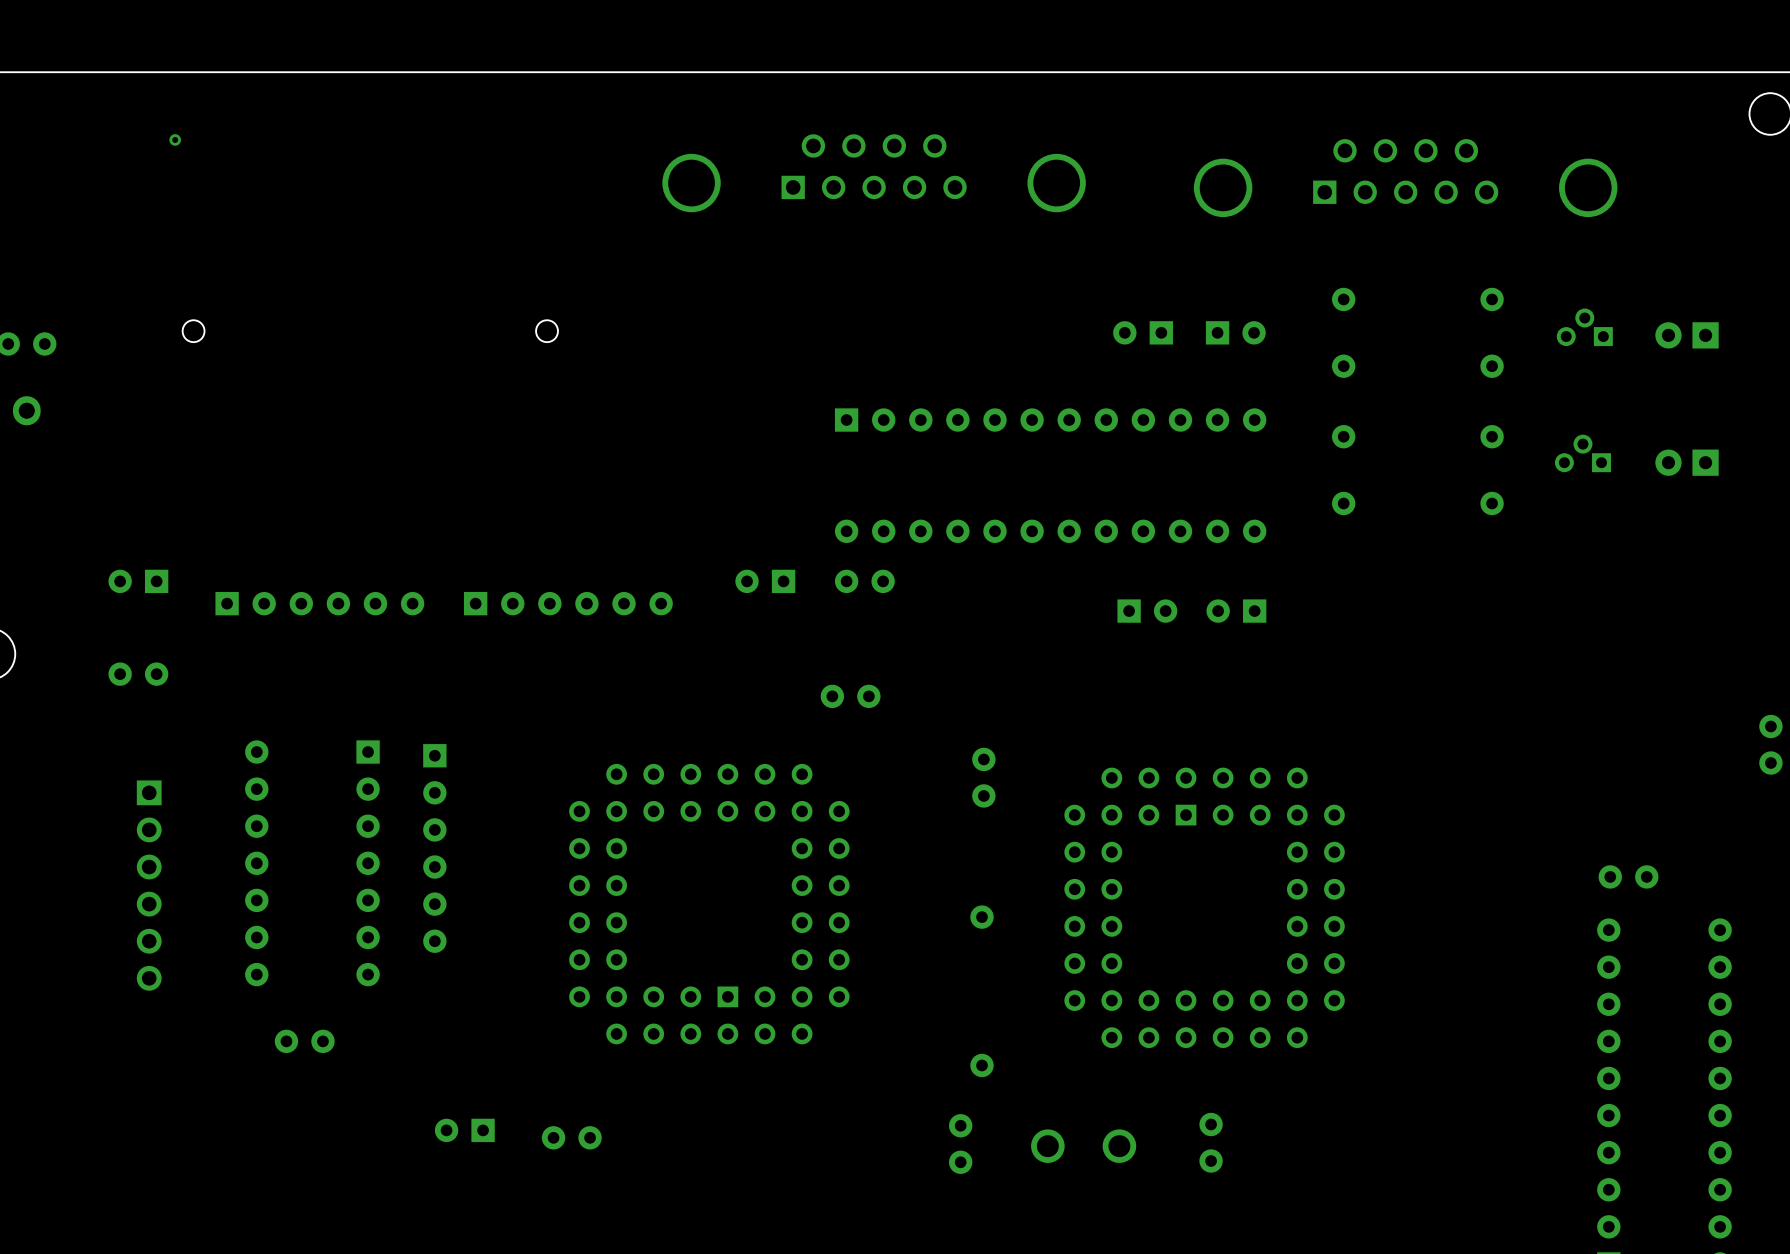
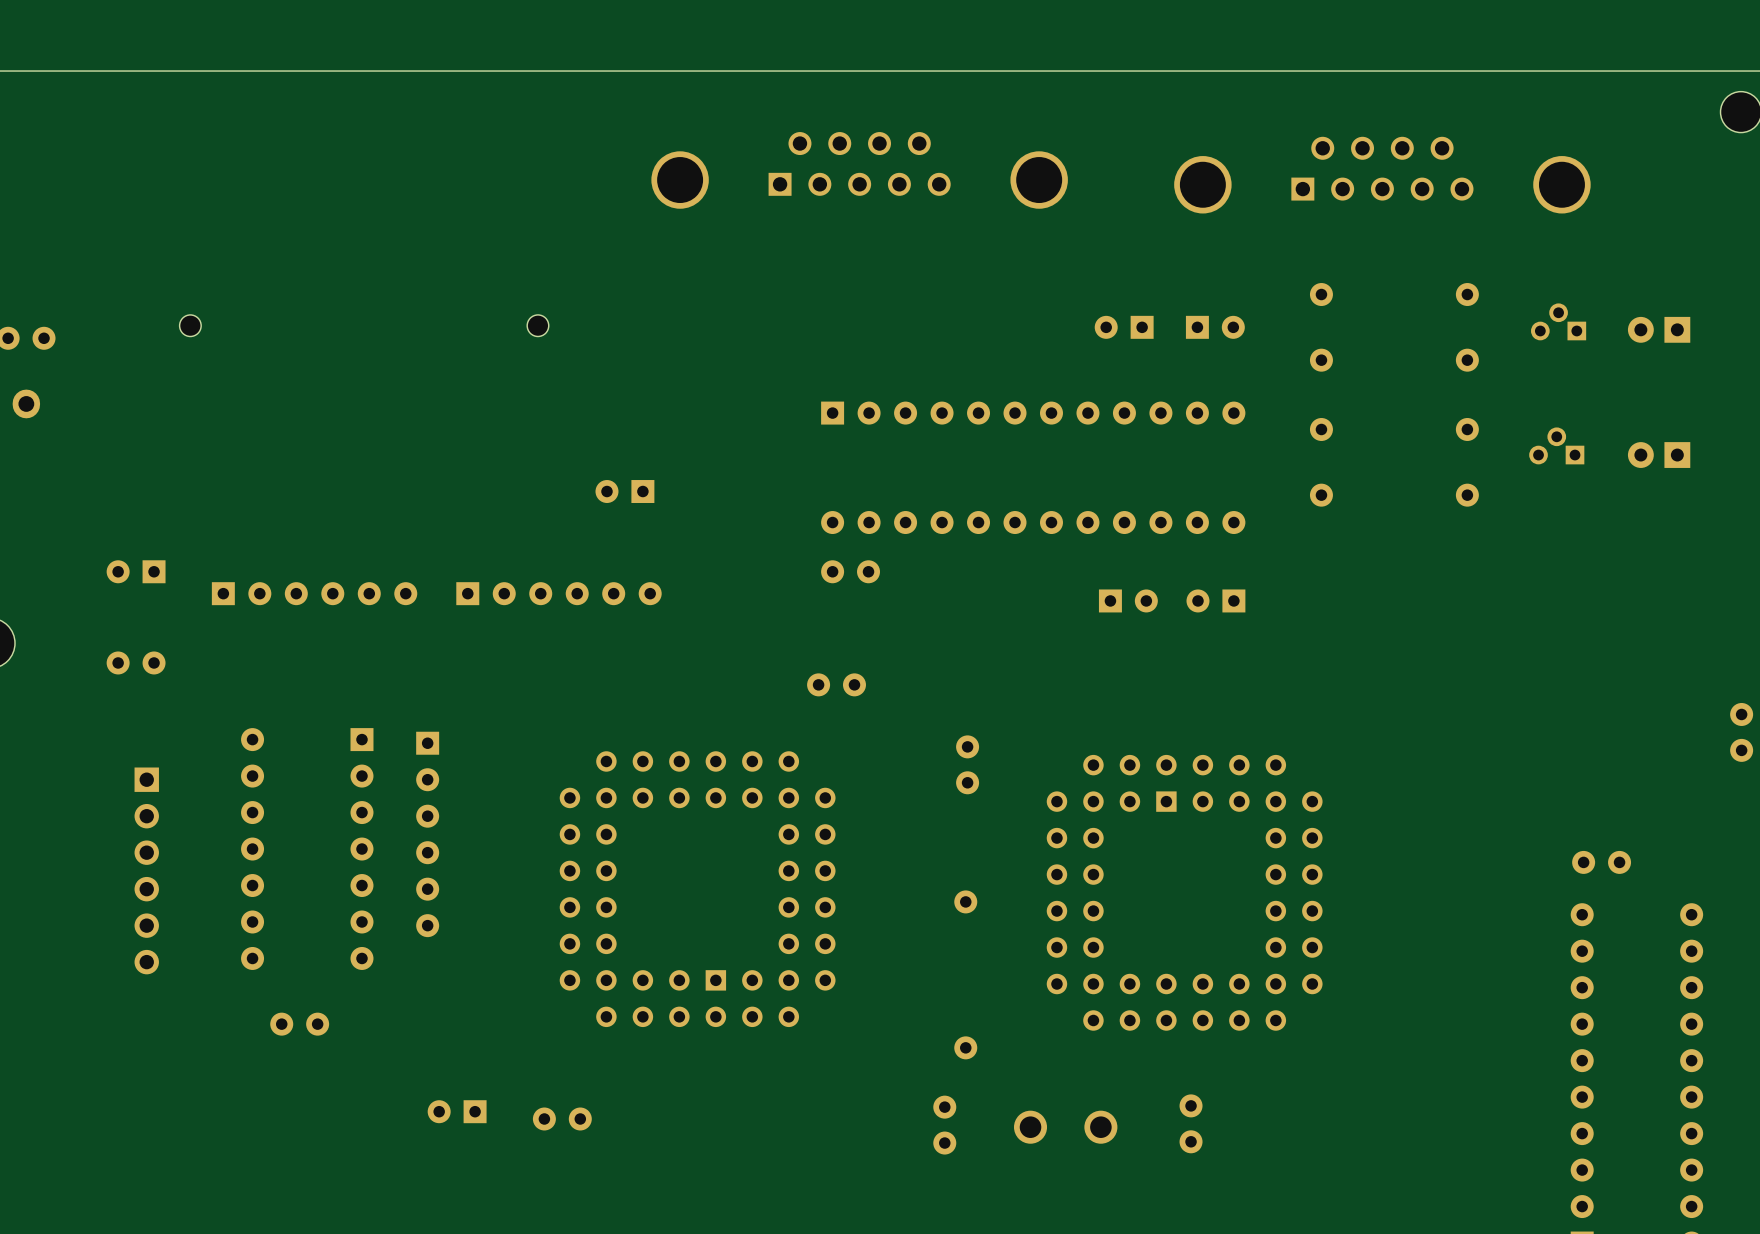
via: (175, 139) -> none
part position: (765, 581) -> (624, 491)

